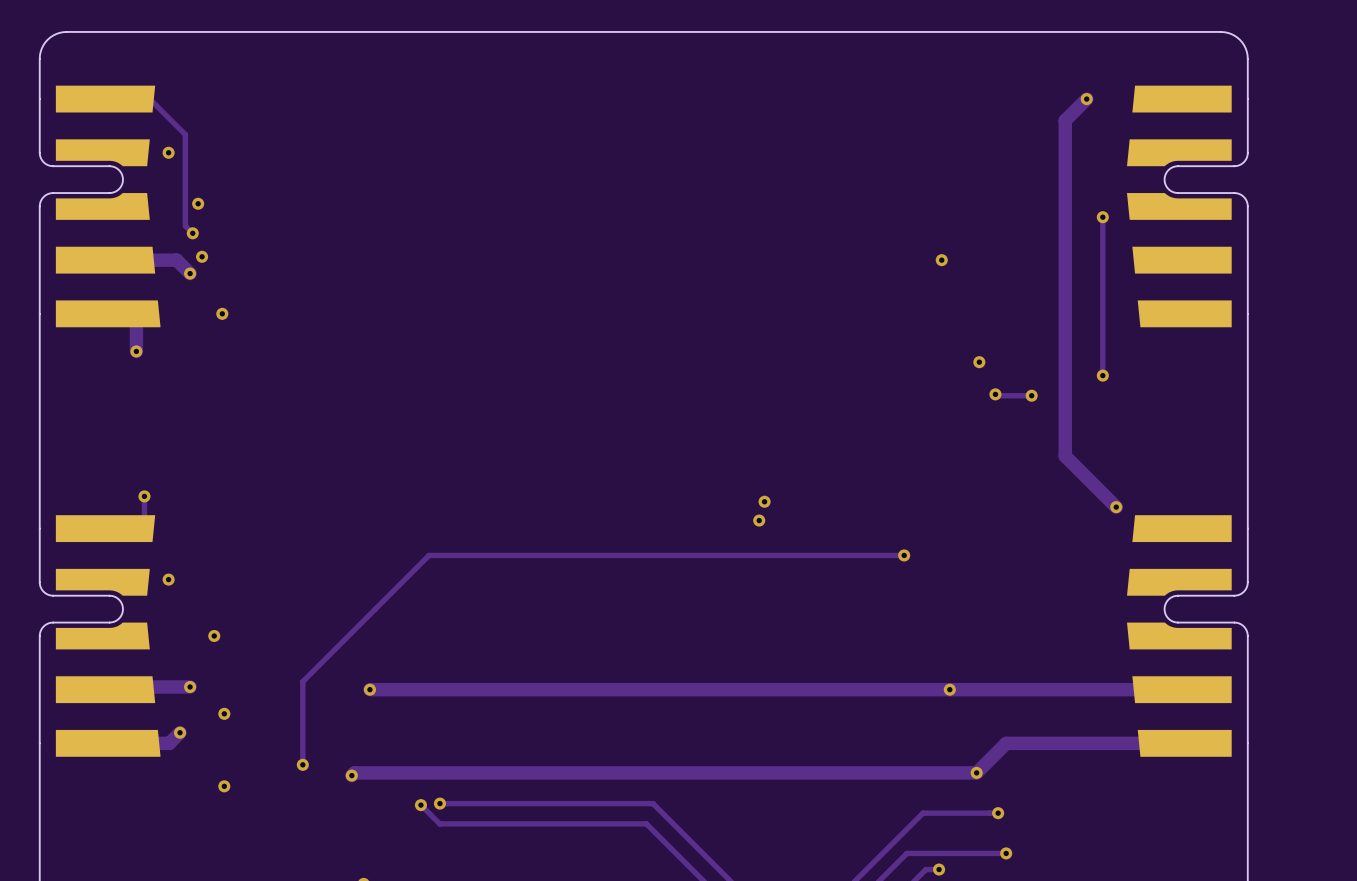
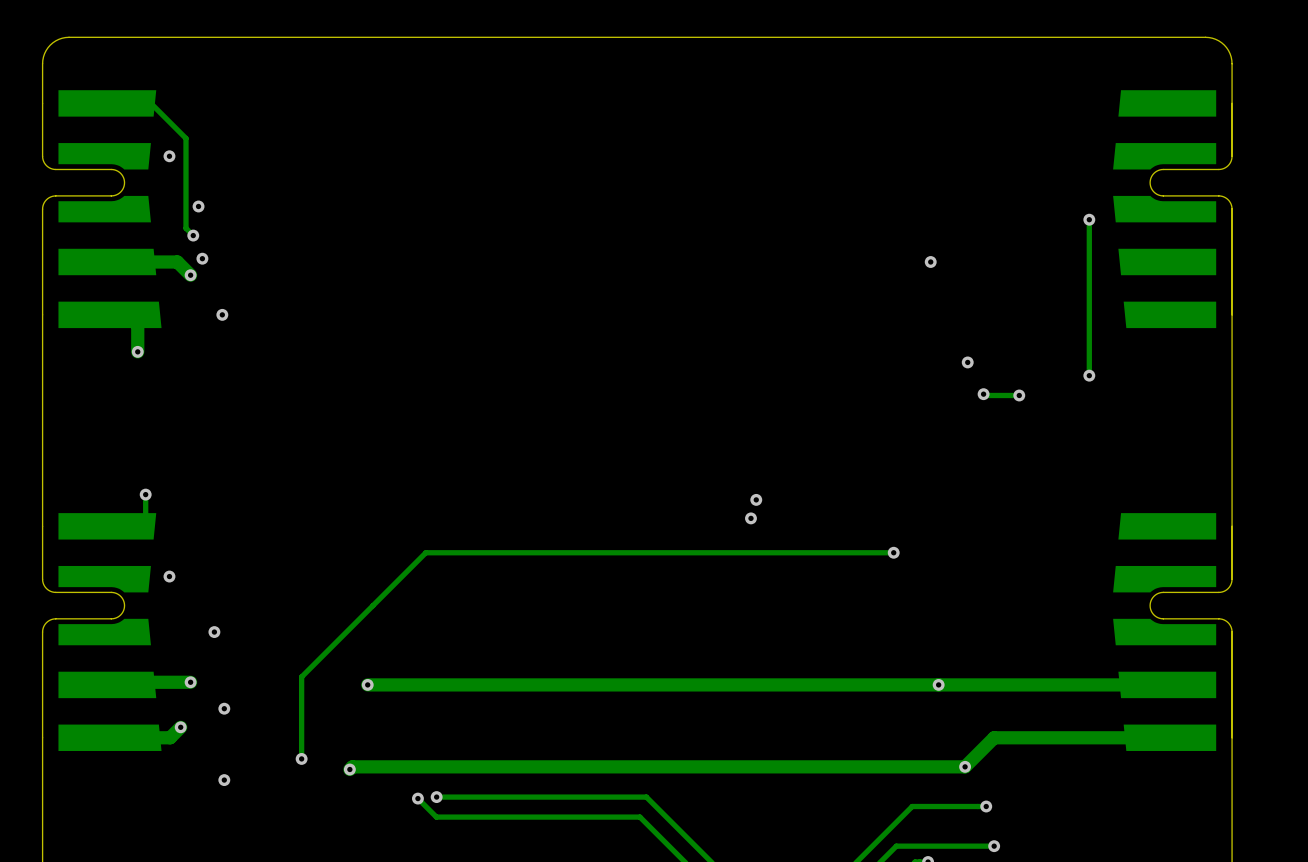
track: (1086, 99) (1065, 120) (1065, 456) (1116, 507) -> none
via: (1086, 99) -> none
board edge: none -> (1232, 103) (1232, 156)
board edge: none -> (1232, 209) (1232, 314)
via: (1116, 507) -> none
board edge: none -> (1232, 526) (1232, 579)
board edge: none -> (1232, 632) (1232, 737)

